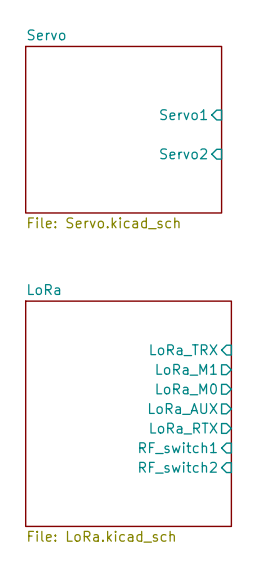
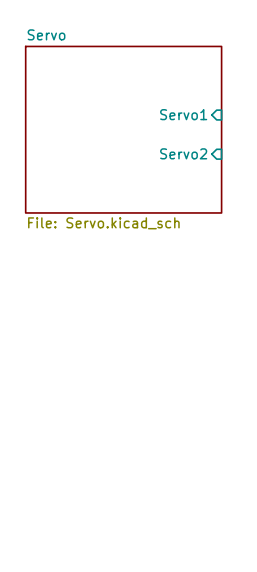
sheet pin: LoRa_TRX (183, 350) -> none
sheet pin: LoRa_M1 (186, 369) -> none
sheet pin: LoRa_M0 (186, 389) -> none
sheet pin: LoRa_AUX (183, 408) -> none
sheet LoRa: File: LoRa.kicad_sch (128, 413) -> none
sheet pin: LoRa_RTX (183, 428) -> none
sheet pin: RF_switch1 (178, 448) -> none
sheet pin: RF_switch2 (178, 467) -> none

